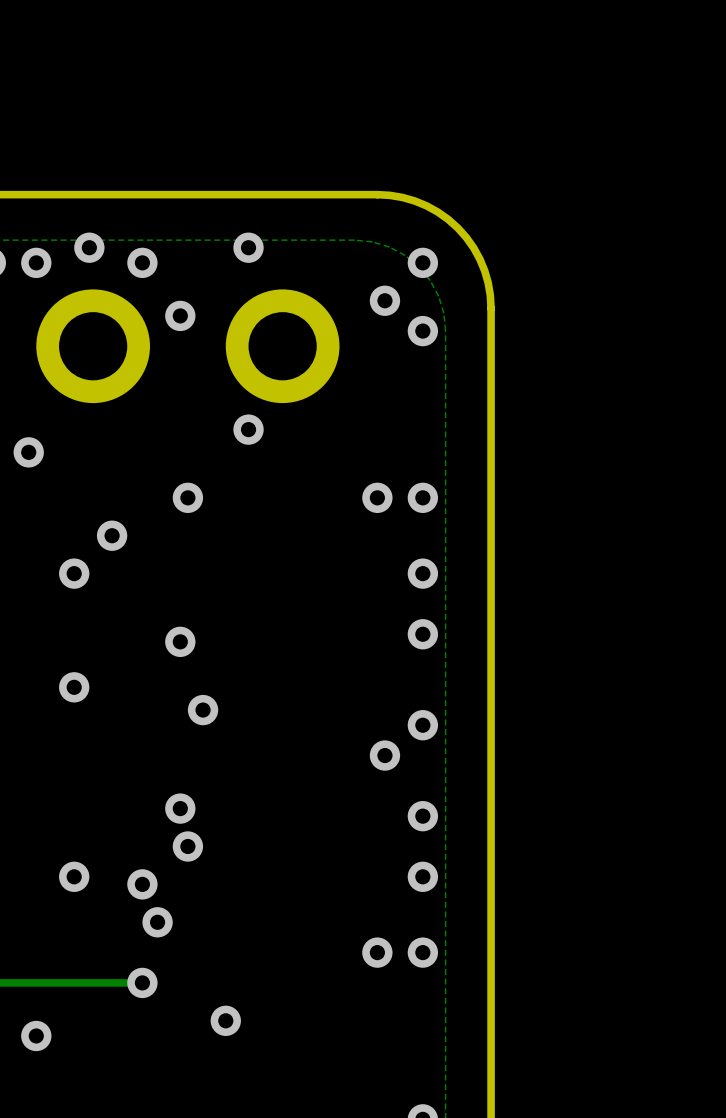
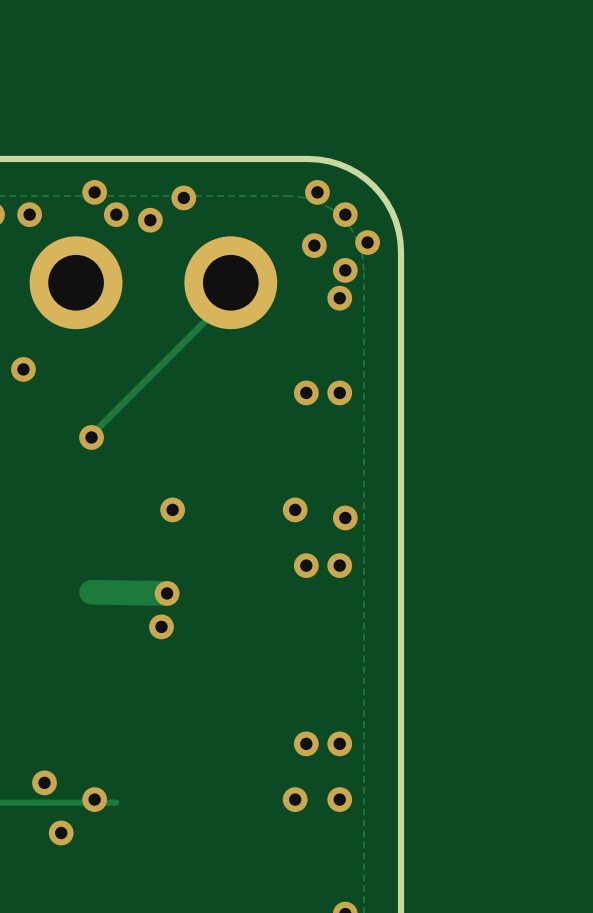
via: none -> (317, 192)
via position: (89, 247) -> (94, 192)
via position: (248, 247) -> (183, 197)
via: none -> (150, 220)
via: none -> (367, 242)
via: (180, 315) -> none
track: none -> (228, 281) (228, 298) (89, 437)
via: none -> (339, 298)
via: (248, 429) -> none
via: (187, 497) -> none
via position: (377, 497) -> (306, 392)
via position: (422, 497) -> (339, 392)
via: (74, 573) -> none
via: (422, 573) -> none
via: none -> (295, 509)
via position: (180, 641) -> (172, 509)
via: (74, 687) -> none
via: none -> (306, 565)
via: none -> (339, 565)
via position: (203, 710) -> (167, 593)
track: none -> (91, 592) (167, 593)
via: (422, 725) -> none
via: (384, 755) -> none
via: none -> (161, 626)
via: (180, 808) -> none
via: (422, 816) -> none
via: (187, 846) -> none
via: (74, 876) -> none
via: (422, 876) -> none
via: (142, 884) -> none
via: none -> (306, 743)
via: none -> (339, 743)
via: (157, 922) -> none
via position: (377, 952) -> (295, 799)
via position: (422, 952) -> (339, 799)
via: none -> (44, 782)
via position: (142, 982) -> (94, 799)
via: none -> (61, 833)
via: (225, 1020) -> none
via: (36, 1035) -> none

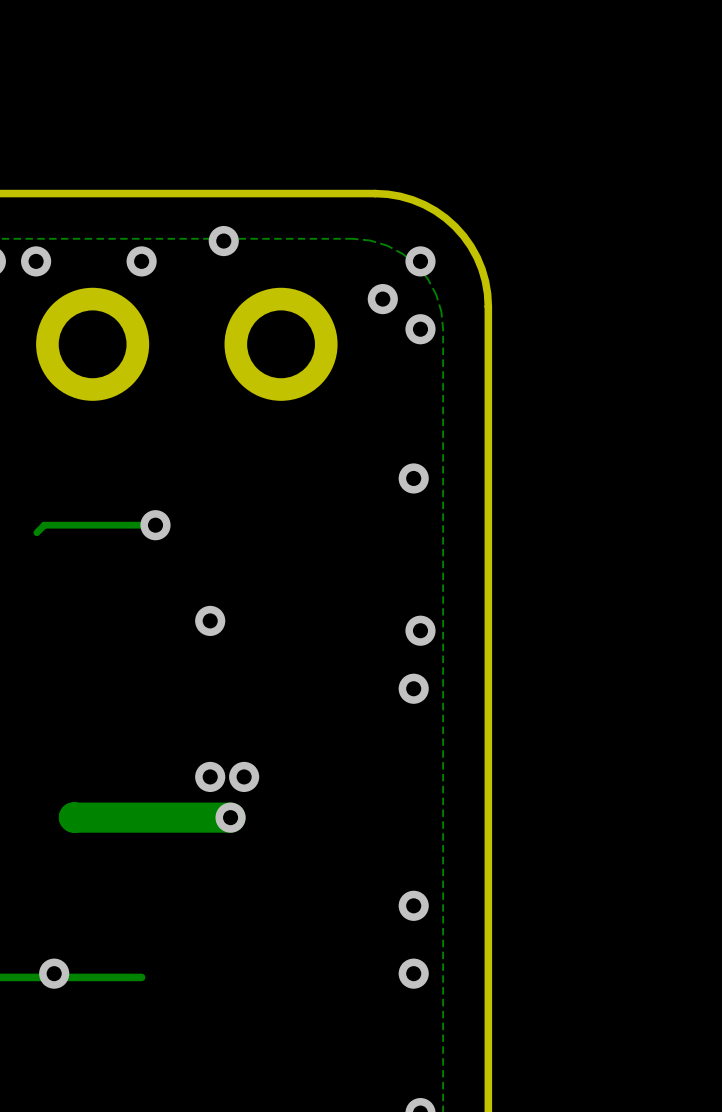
via: (94, 192) -> none
via: (317, 192) -> none
via: (150, 220) -> none
via: (367, 242) -> none
track: (228, 281) (228, 298) (89, 437) -> none
via: (339, 298) -> none
via: (23, 369) -> none
via: (306, 392) -> none
track: none -> (155, 525) (44, 525) (36, 532)
via position: (91, 437) -> (155, 525)
via: (295, 509) -> none
via: (306, 565) -> none
track: (91, 592) (167, 593) -> none
via: (167, 593) -> none
via position: (161, 626) -> (210, 776)
via: none -> (244, 776)
track: none -> (230, 817) (74, 817)
via: none -> (230, 817)
via: (306, 743) -> none
via position: (44, 782) -> (54, 973)
via: (94, 799) -> none
via: (295, 799) -> none
via: (61, 833) -> none

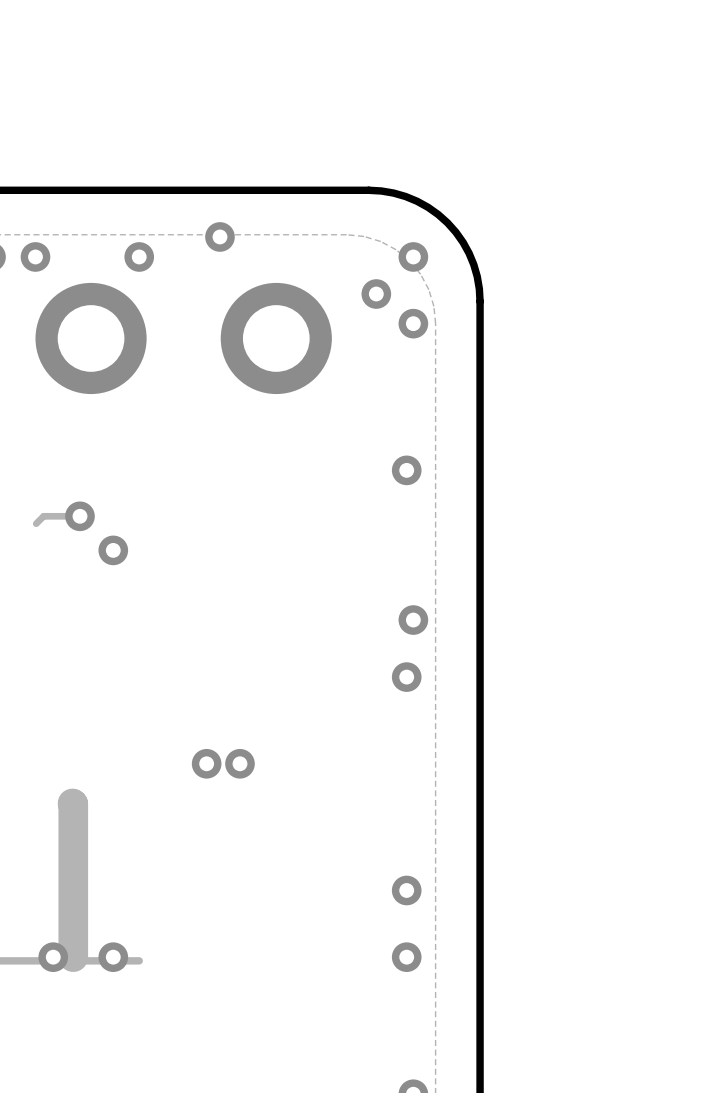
via: none -> (79, 516)
track: (155, 525) (81, 525) -> none
via: (155, 525) -> none
via: none -> (113, 550)
via: (210, 620) -> none
track: (230, 817) (74, 817) -> (73, 957) (73, 804)
via: (230, 817) -> none
via: none -> (113, 957)

